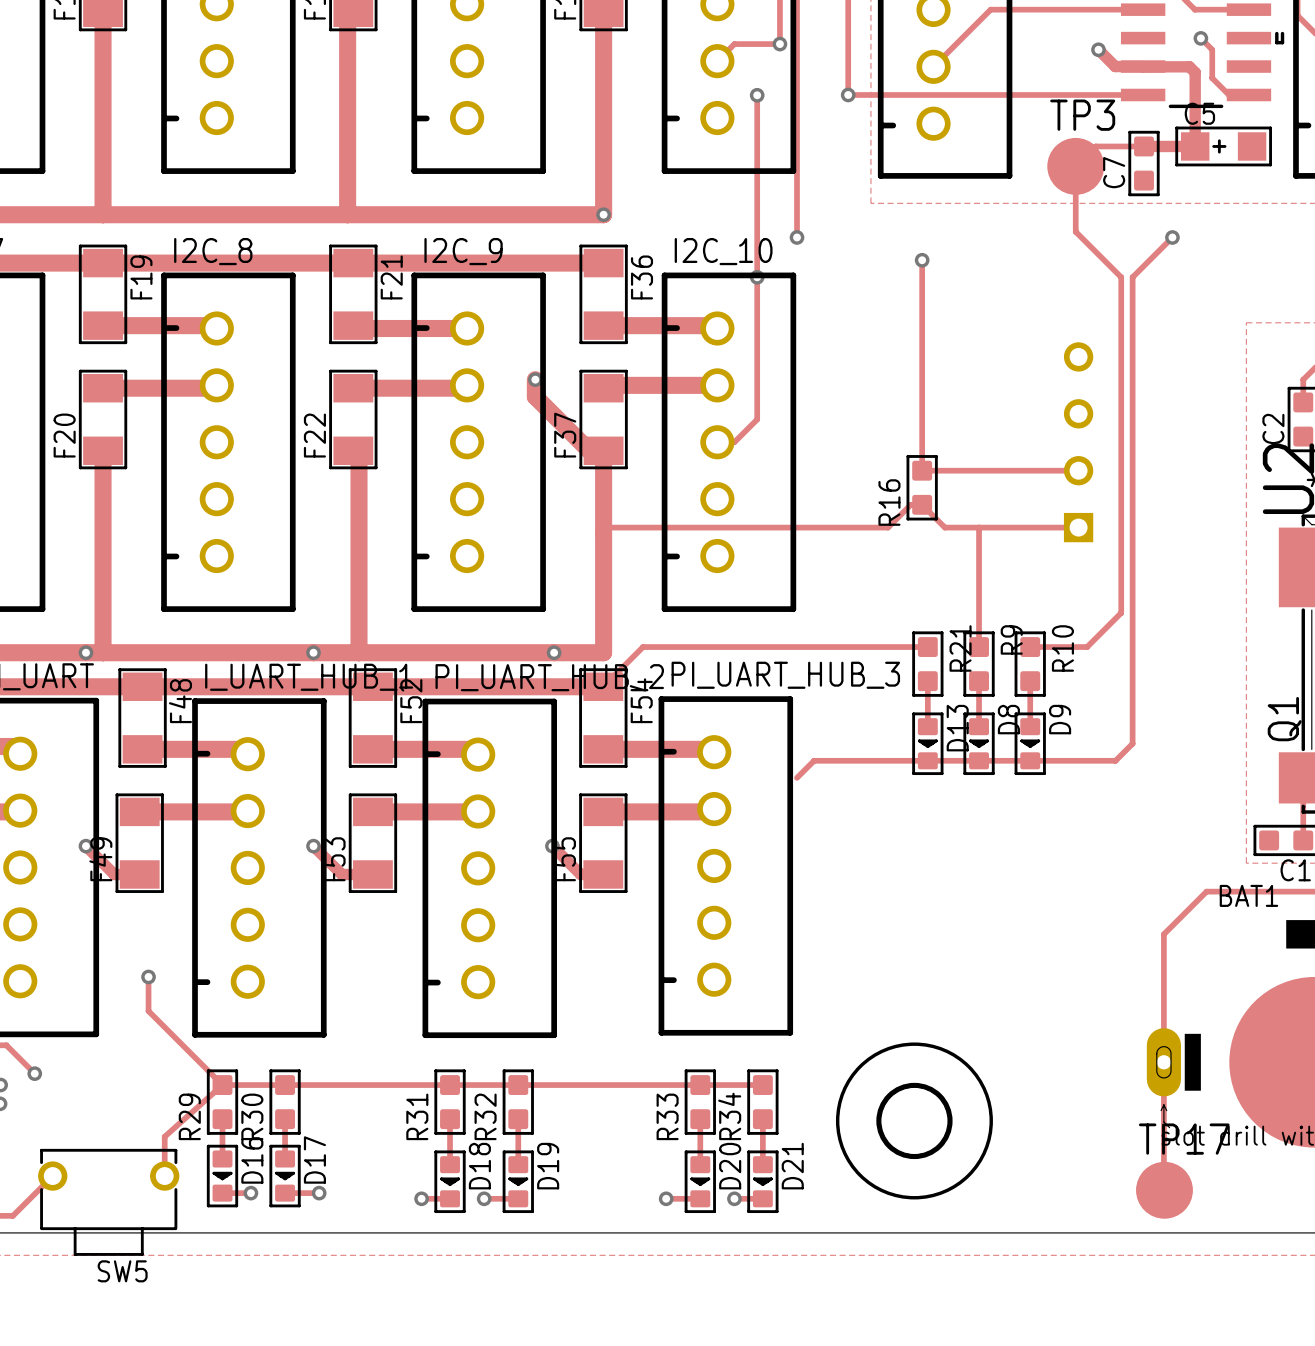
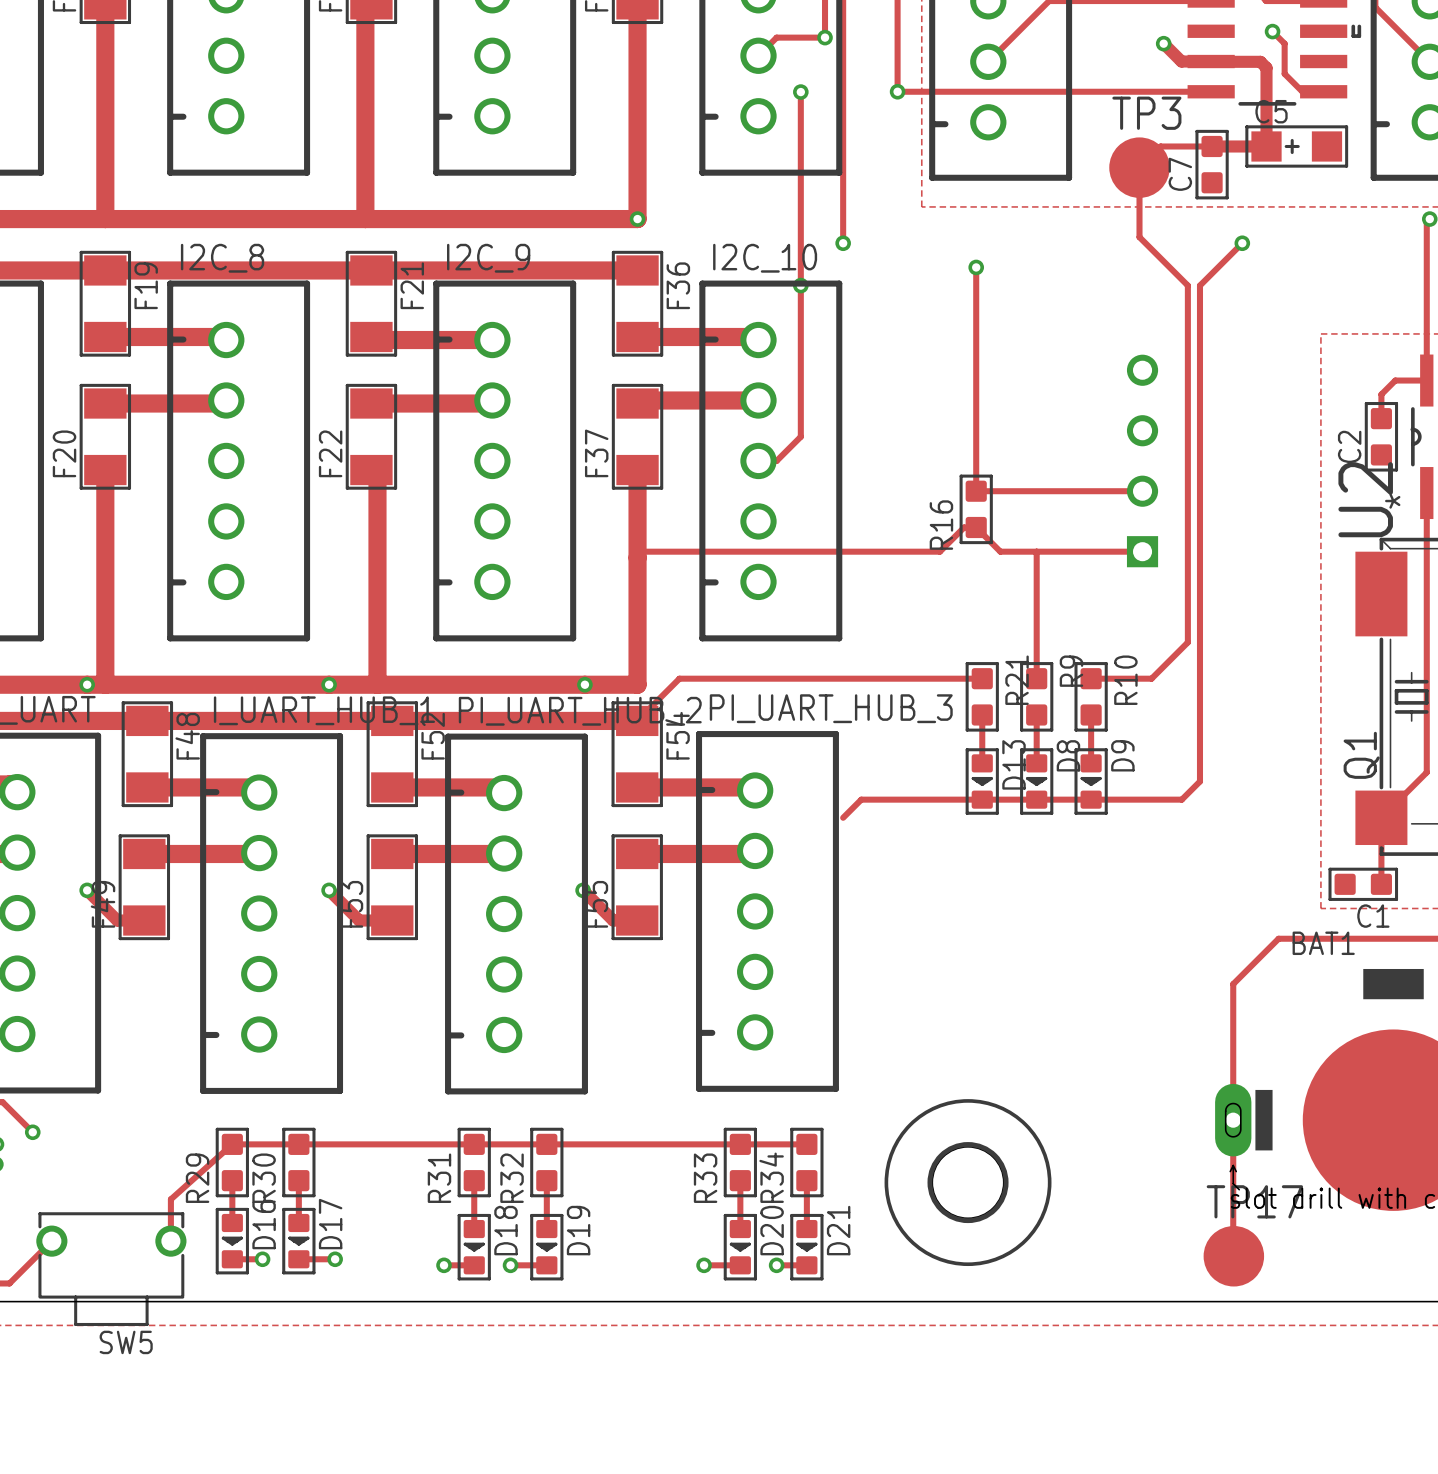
track: (535, 379) (535, 396) (589, 450) (603, 450) -> none
via: (535, 379) -> none
track: (148, 976) (148, 1011) (222, 1085) -> none
via: (148, 976) -> none

